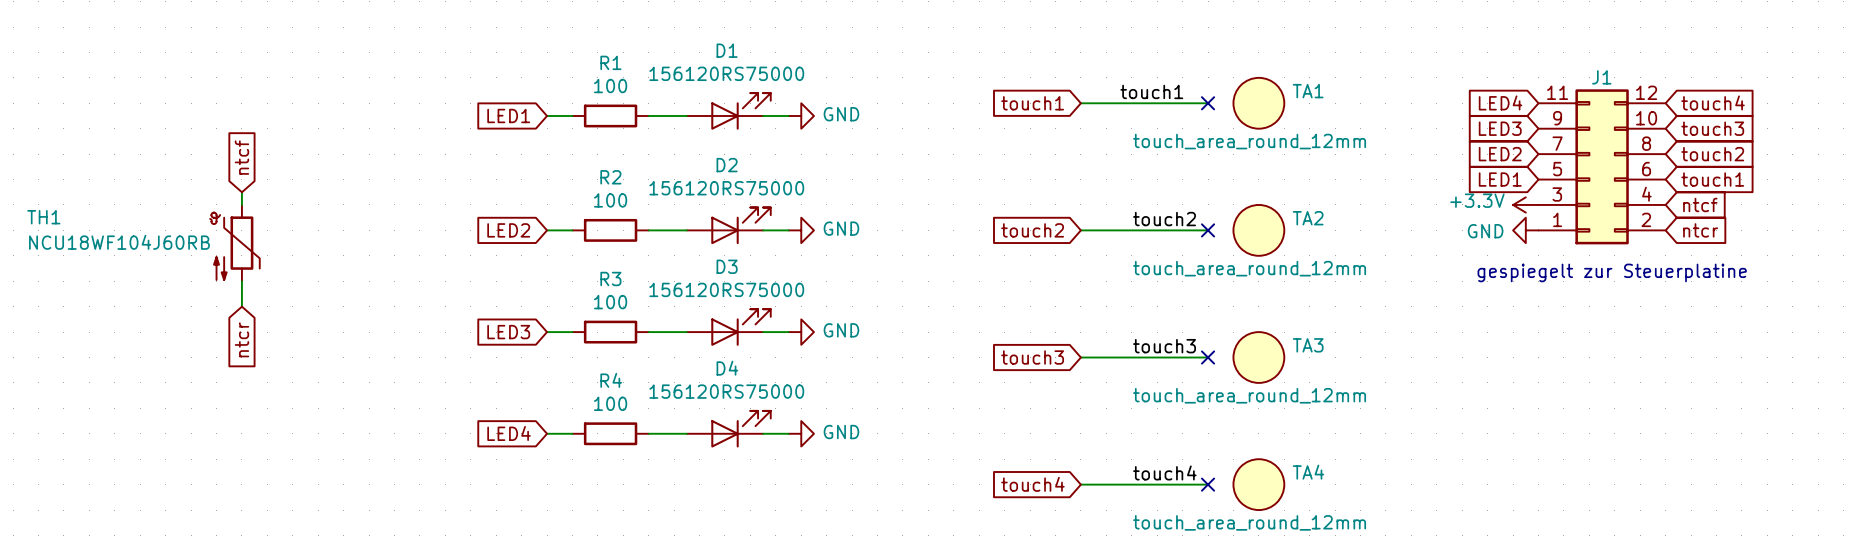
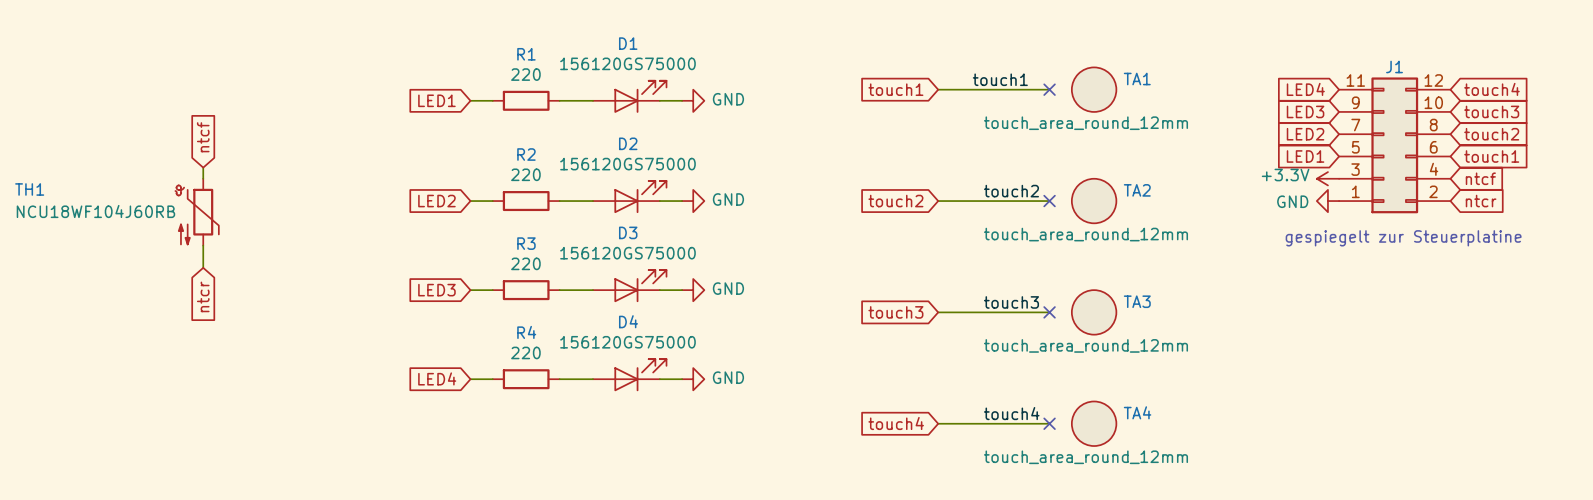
D1 value: 156120RS75000 (726, 73) -> 156120GS75000 (627, 63)
R1 value: 100 (610, 86) -> 220 (525, 74)
D2 value: 156120RS75000 (726, 188) -> 156120GS75000 (627, 164)
R2 value: 100 (610, 200) -> 220 (525, 174)
D3 value: 156120RS75000 (726, 289) -> 156120GS75000 (627, 253)
R3 value: 100 (610, 302) -> 220 (525, 263)
D4 value: 156120RS75000 (726, 391) -> 156120GS75000 (627, 342)
R4 value: 100 (610, 403) -> 220 (525, 352)

